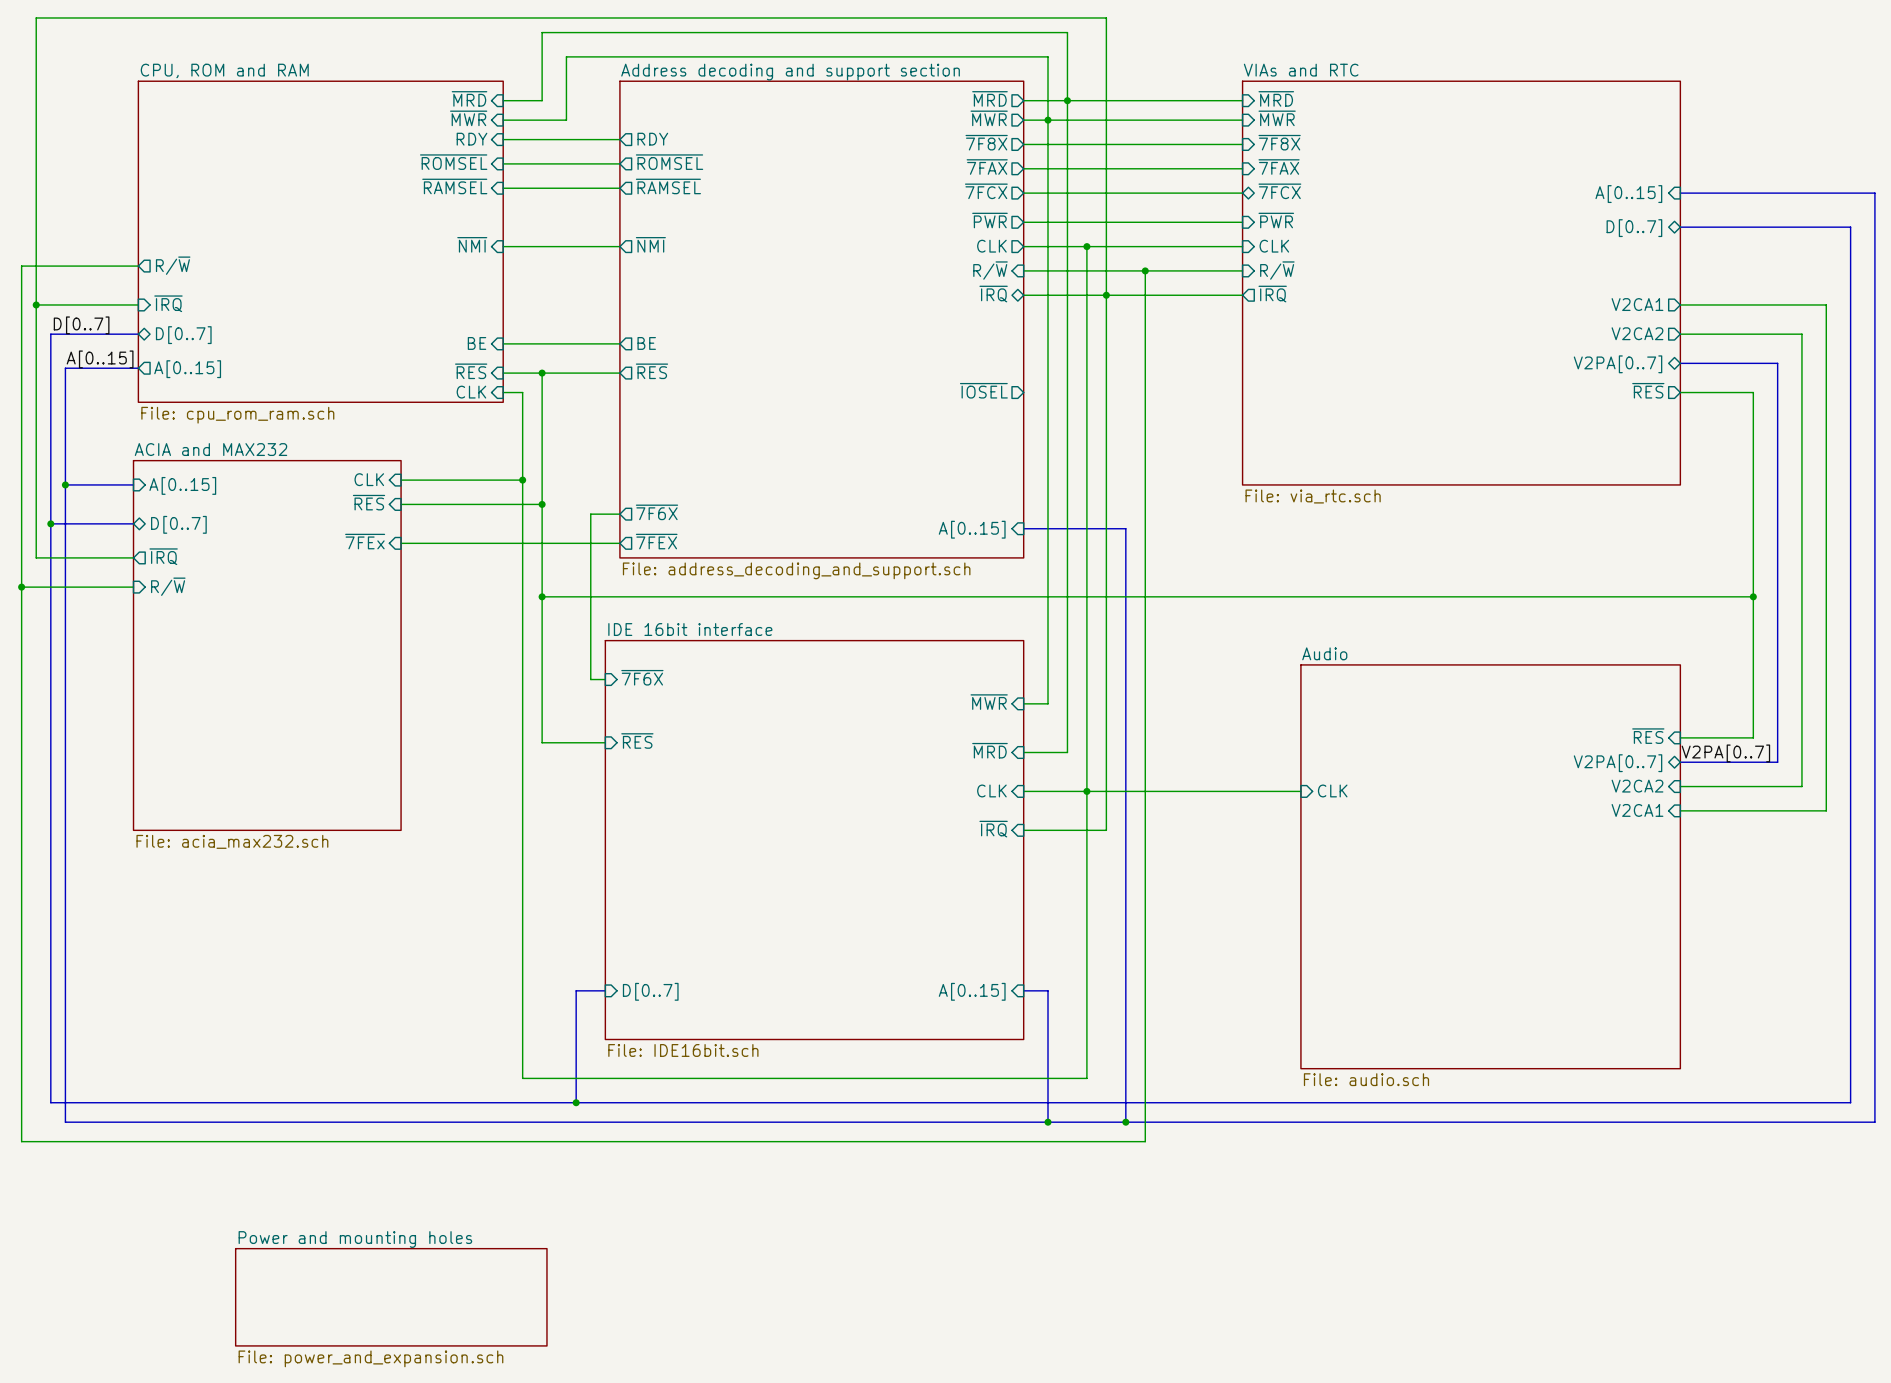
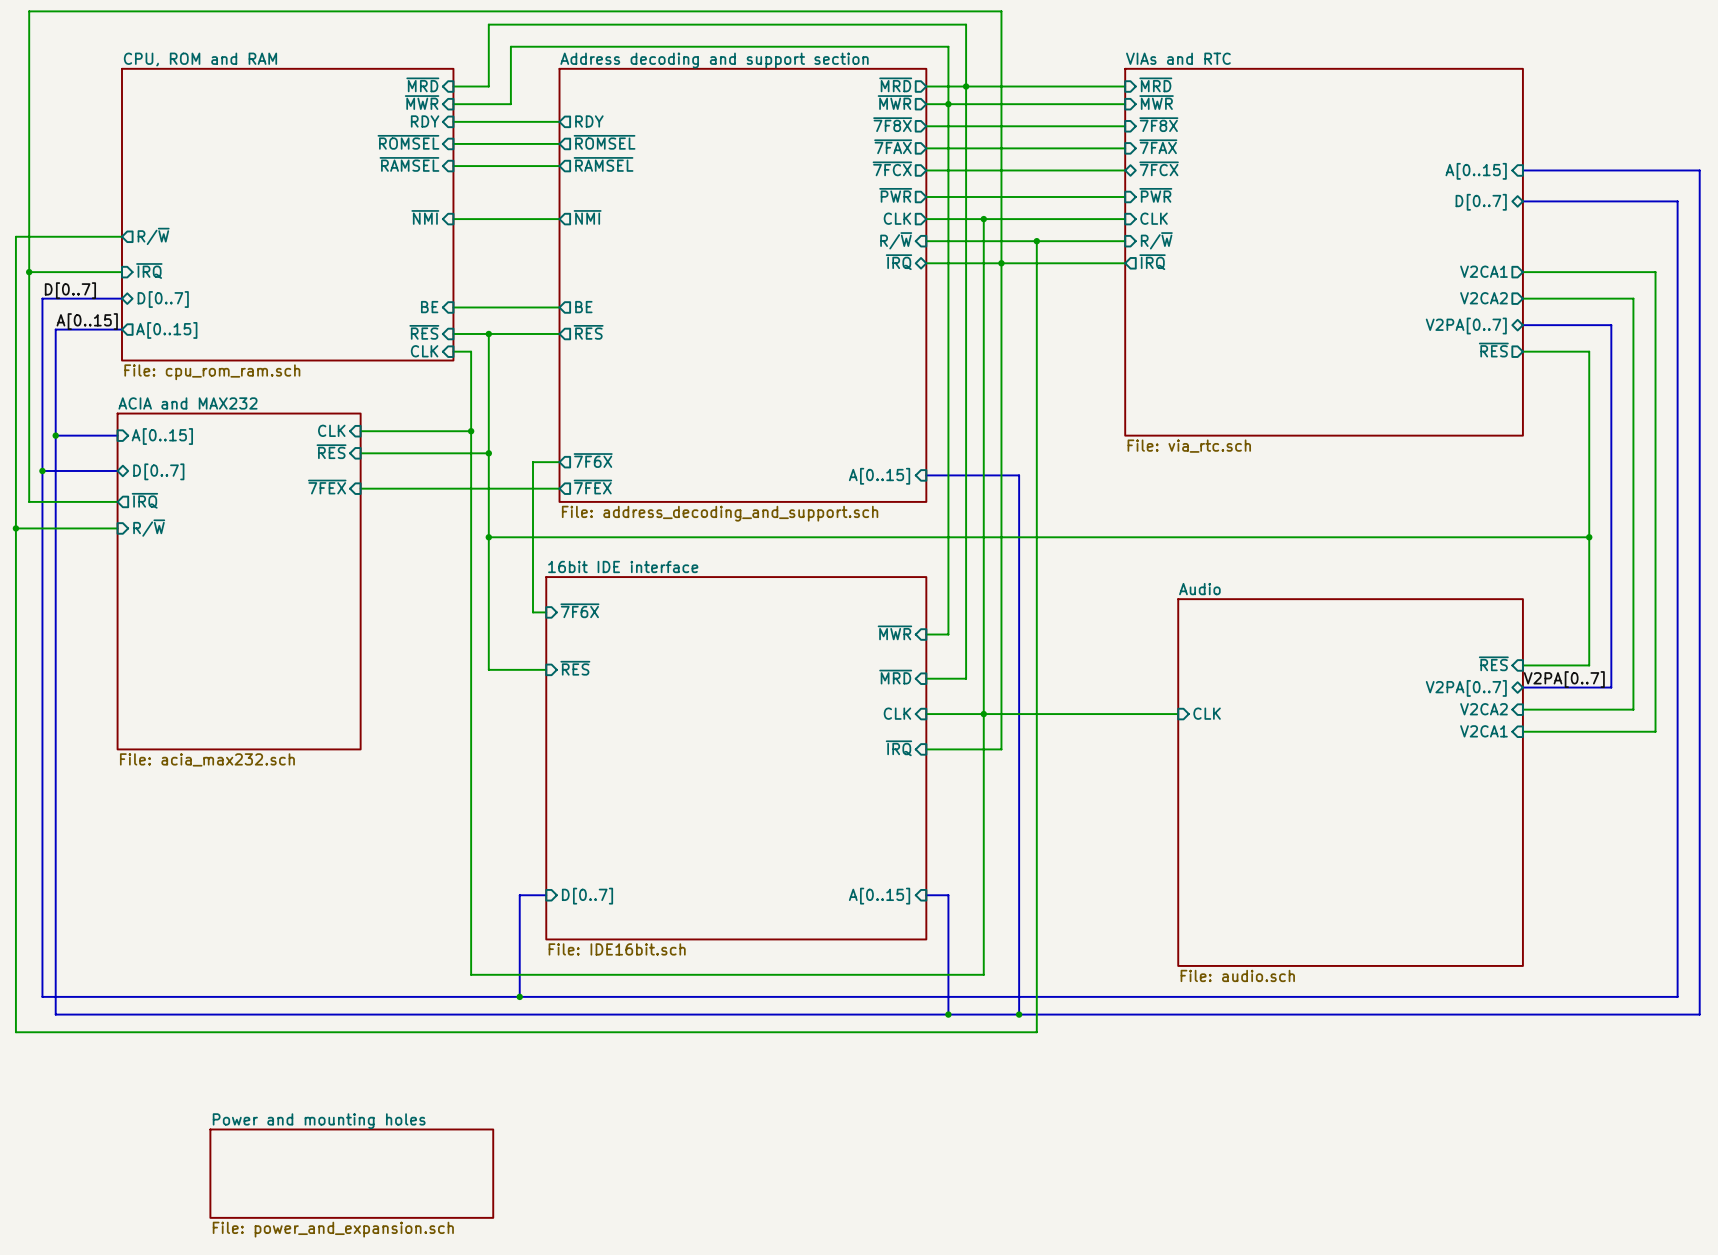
sheet pin: ~{IOSEL} (983, 390) -> none
sheet pin: ~{7FEx} (365, 541) -> ~{7FEX} (327, 487)
sheet IDE 16bit interface name: IDE 16bit interface (690, 629) -> 16bit IDE interface (623, 566)

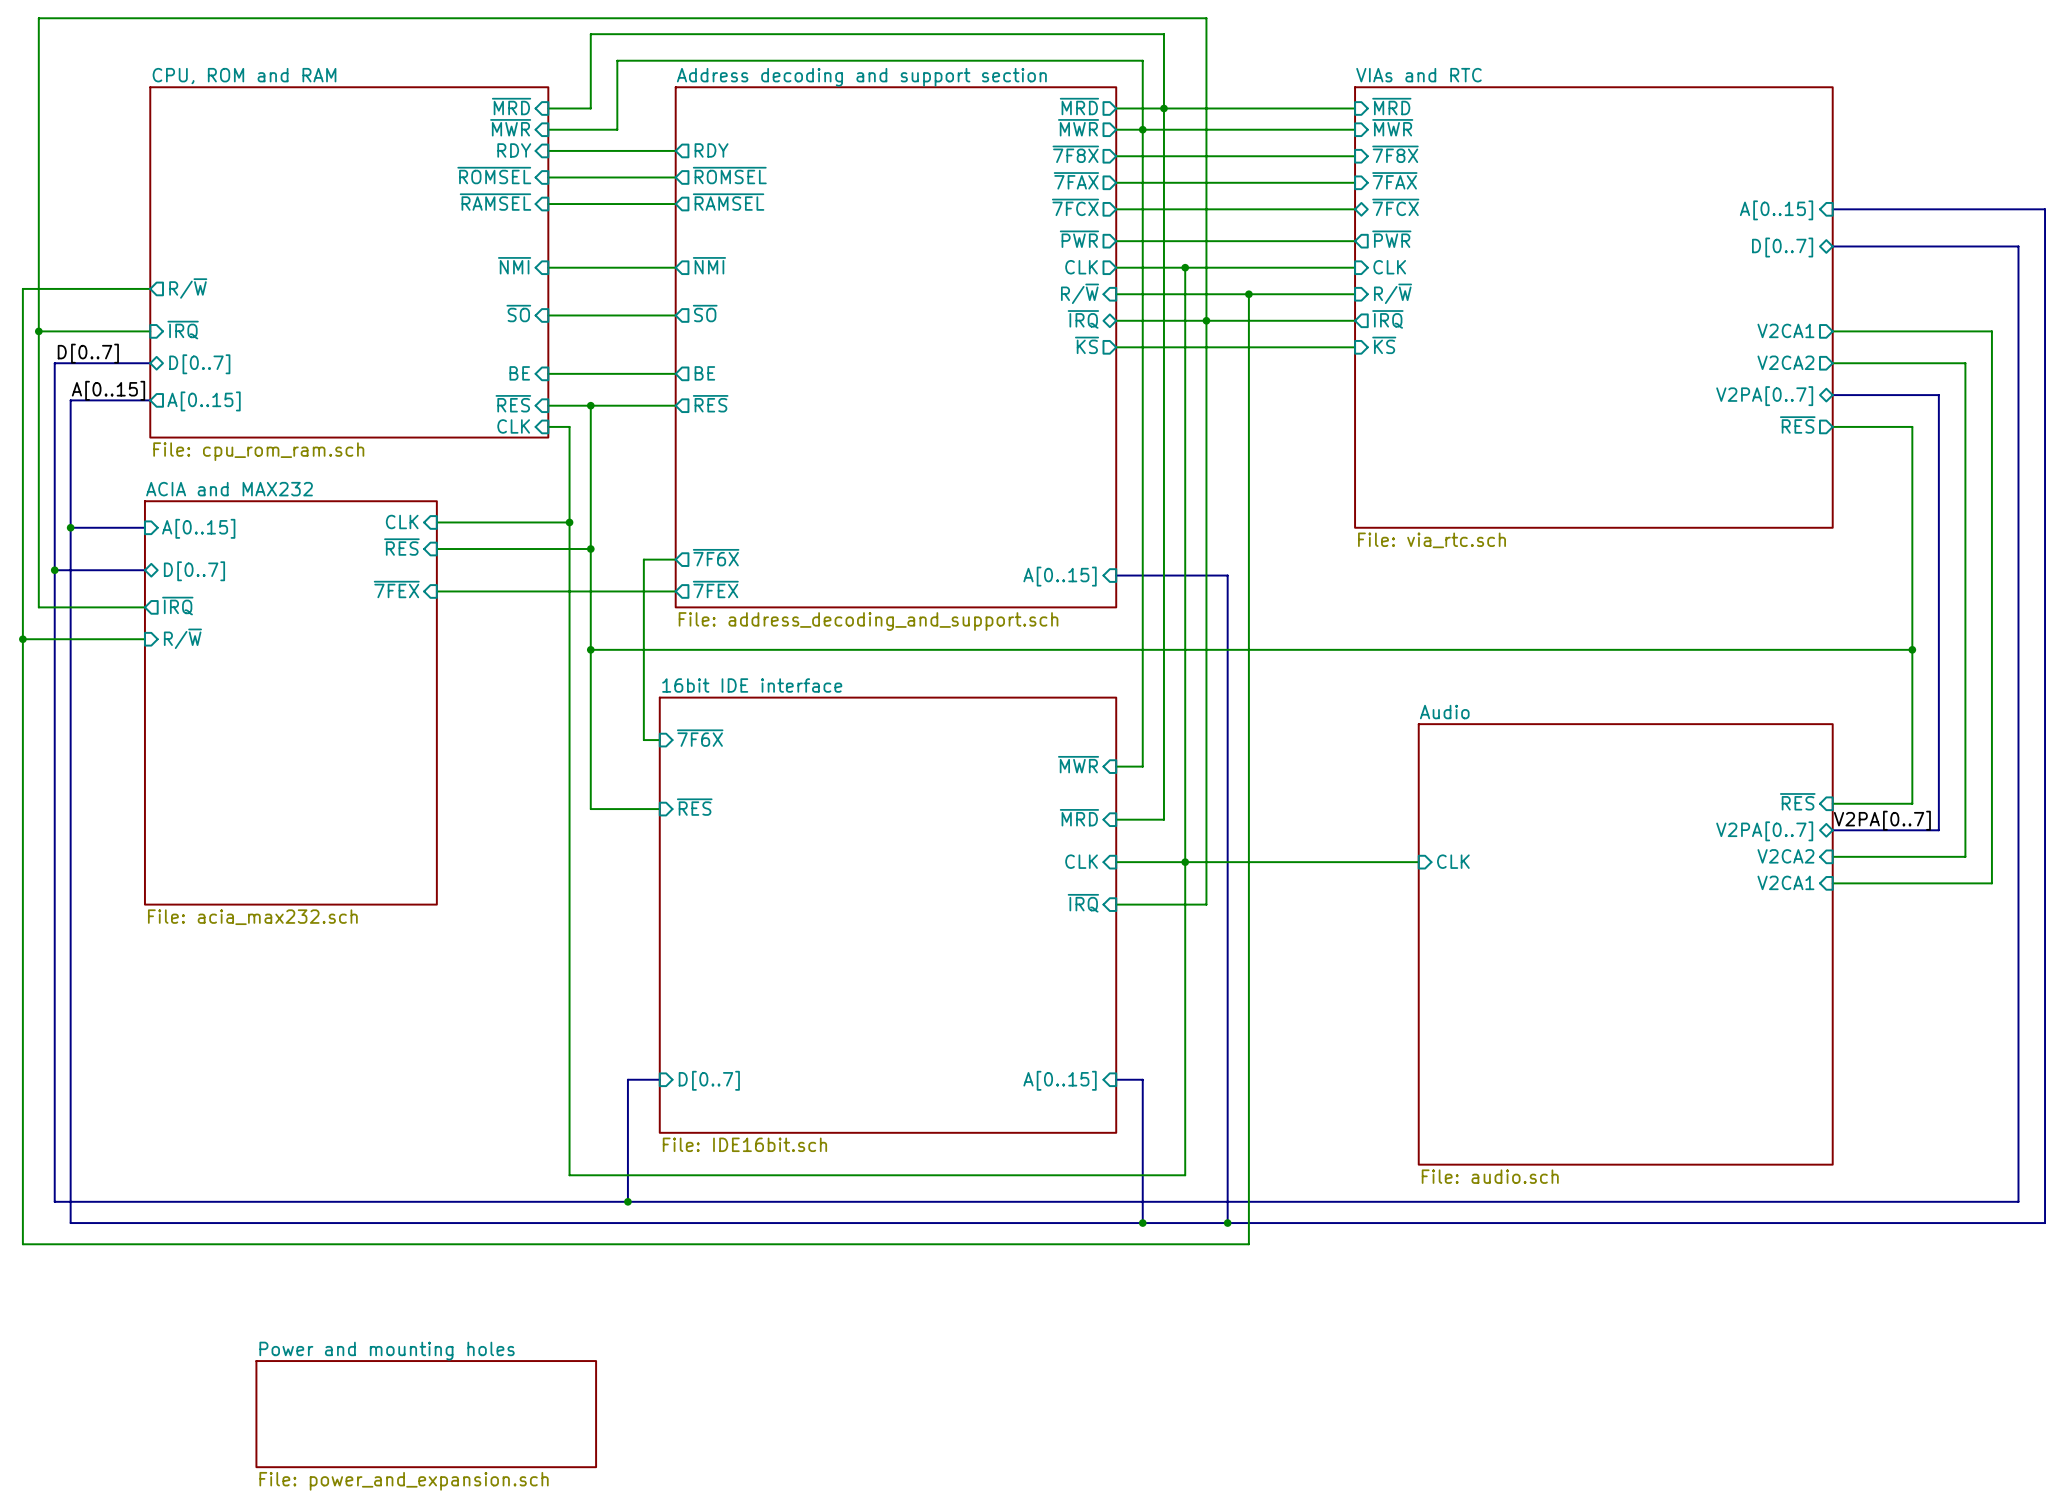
sheet pin shape: input (1155, 195) -> output (1391, 239)
sheet pin: none -> ~{SO} (518, 313)
sheet pin: none -> ~{SO} (705, 313)
wire: none -> (548, 315) (675, 315)
sheet pin: none -> ~{KS} (1087, 345)
sheet pin: none -> ~{KS} (1384, 345)
wire: none -> (1116, 347) (1355, 347)

